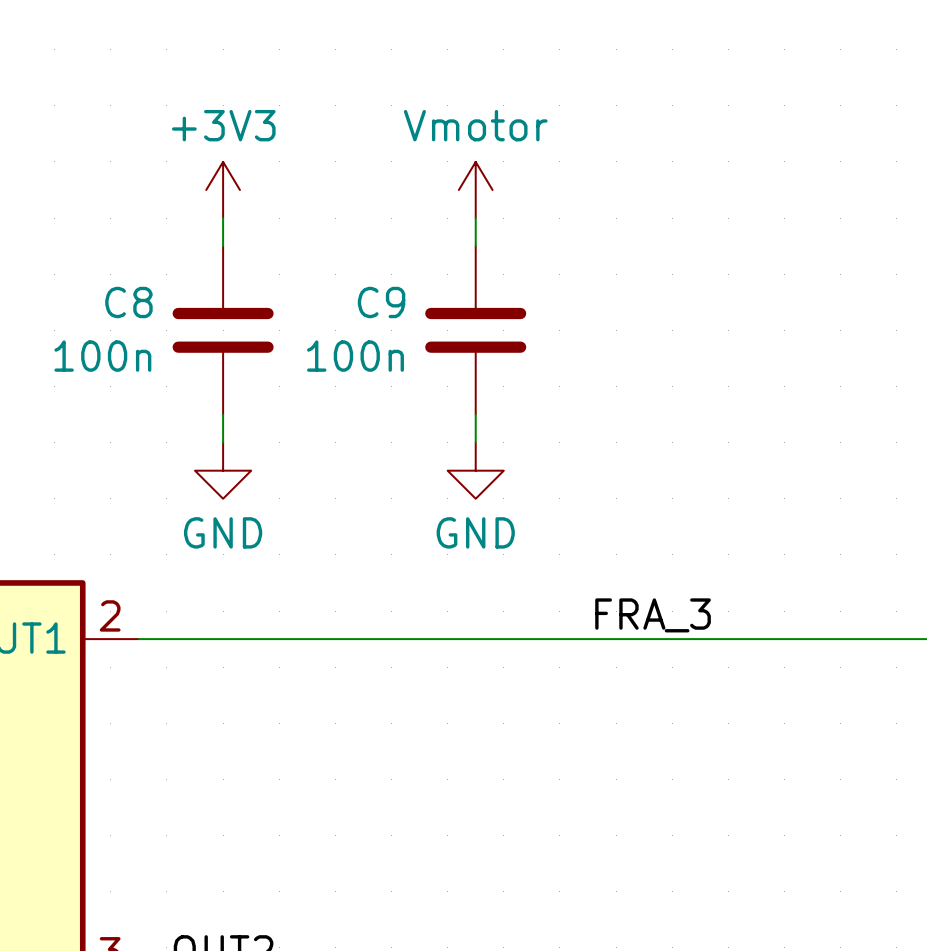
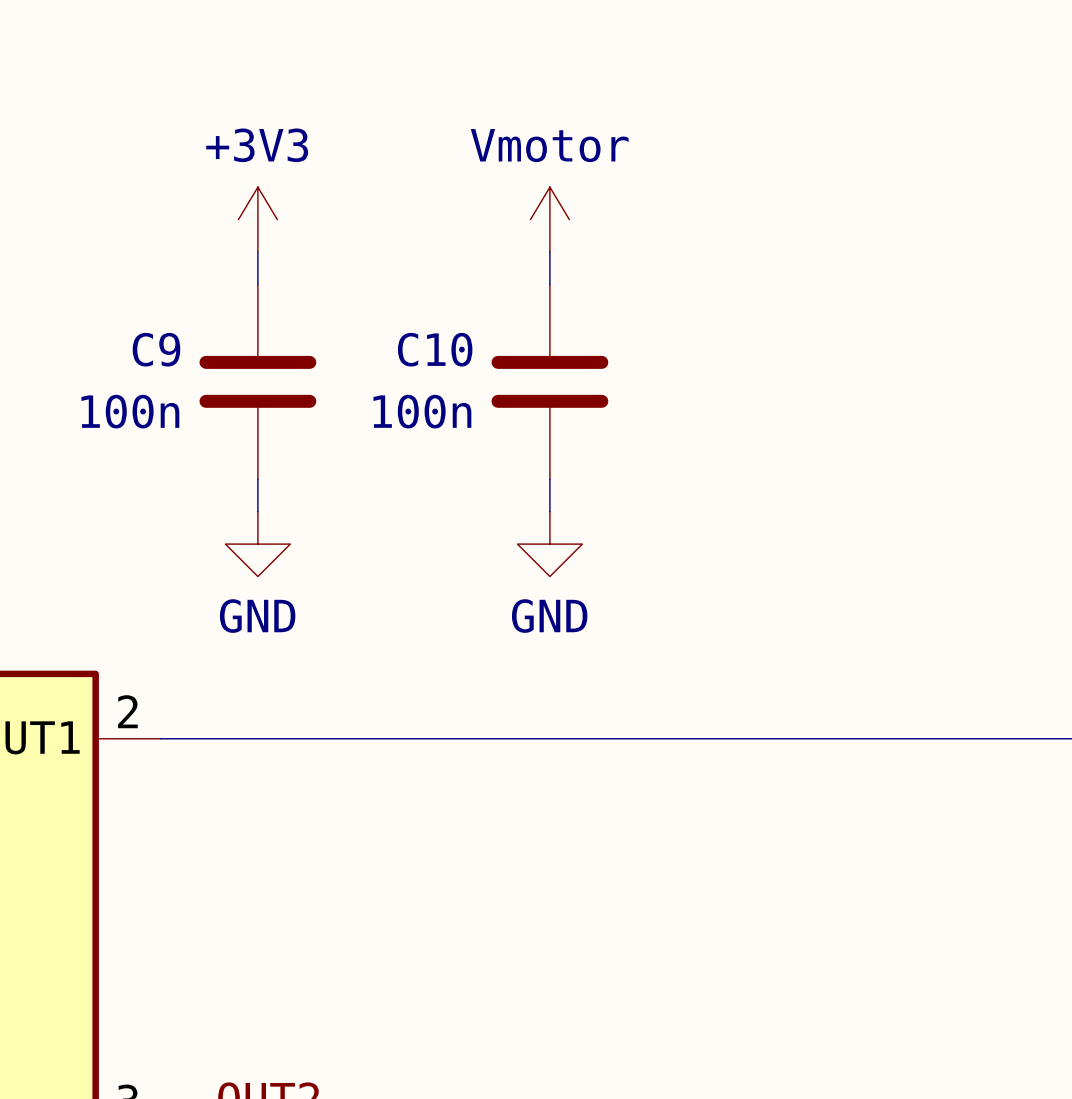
C8 name: C8 (128, 302) -> C9 (156, 349)
C9 name: C9 (381, 302) -> C10 (435, 349)
label: FRA_3 (653, 615) -> none

